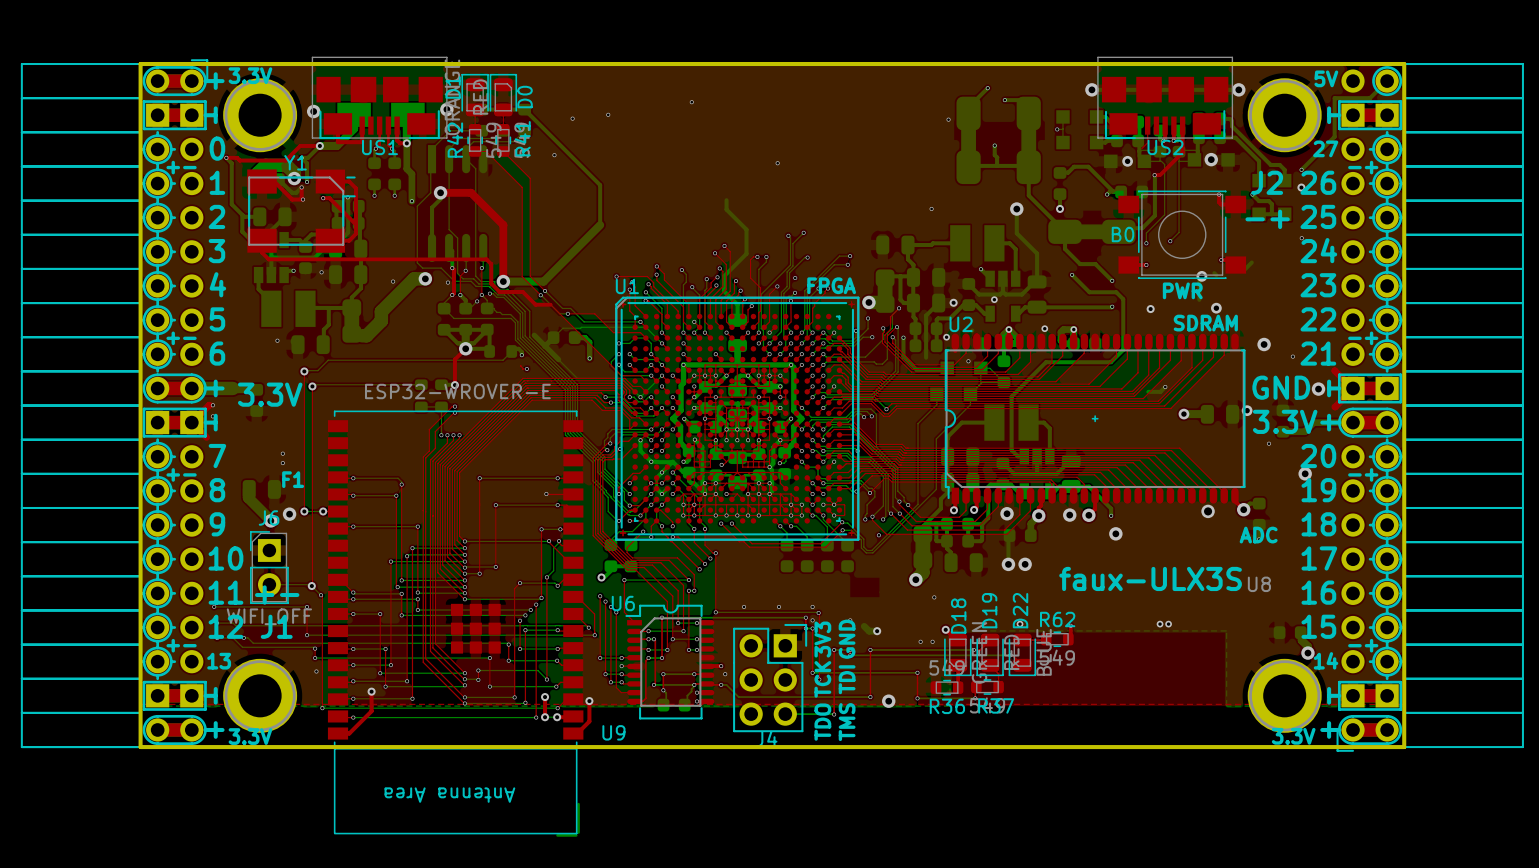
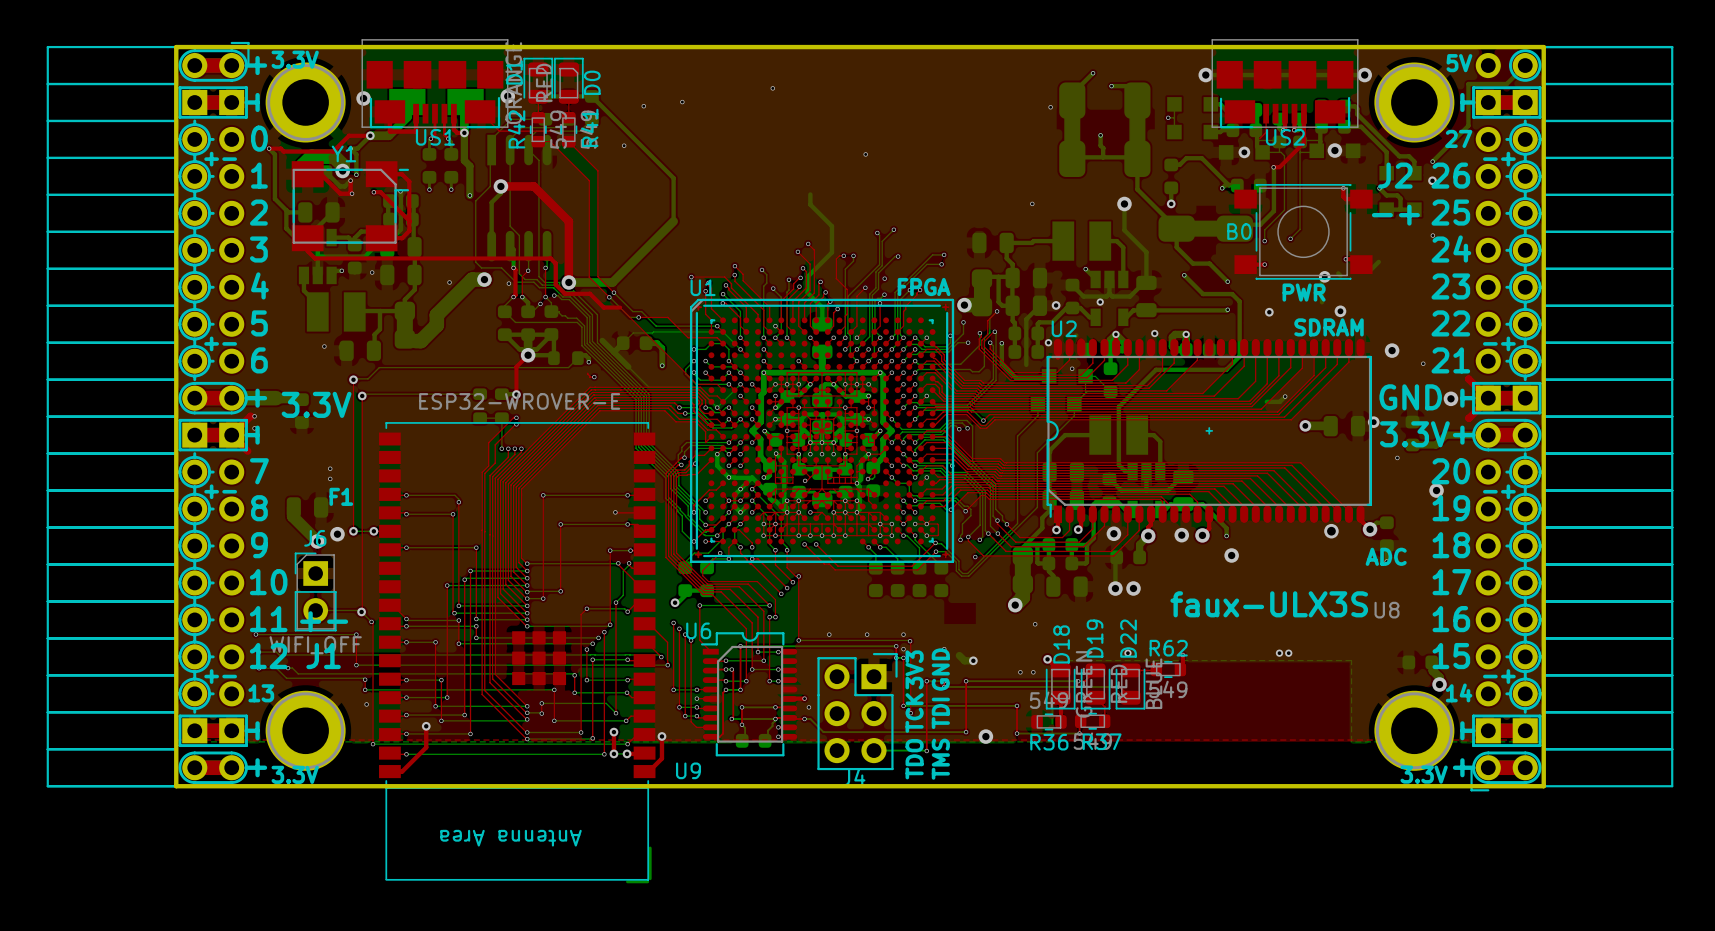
top track: none -> (480, 111) (499, 131) (554, 131)

